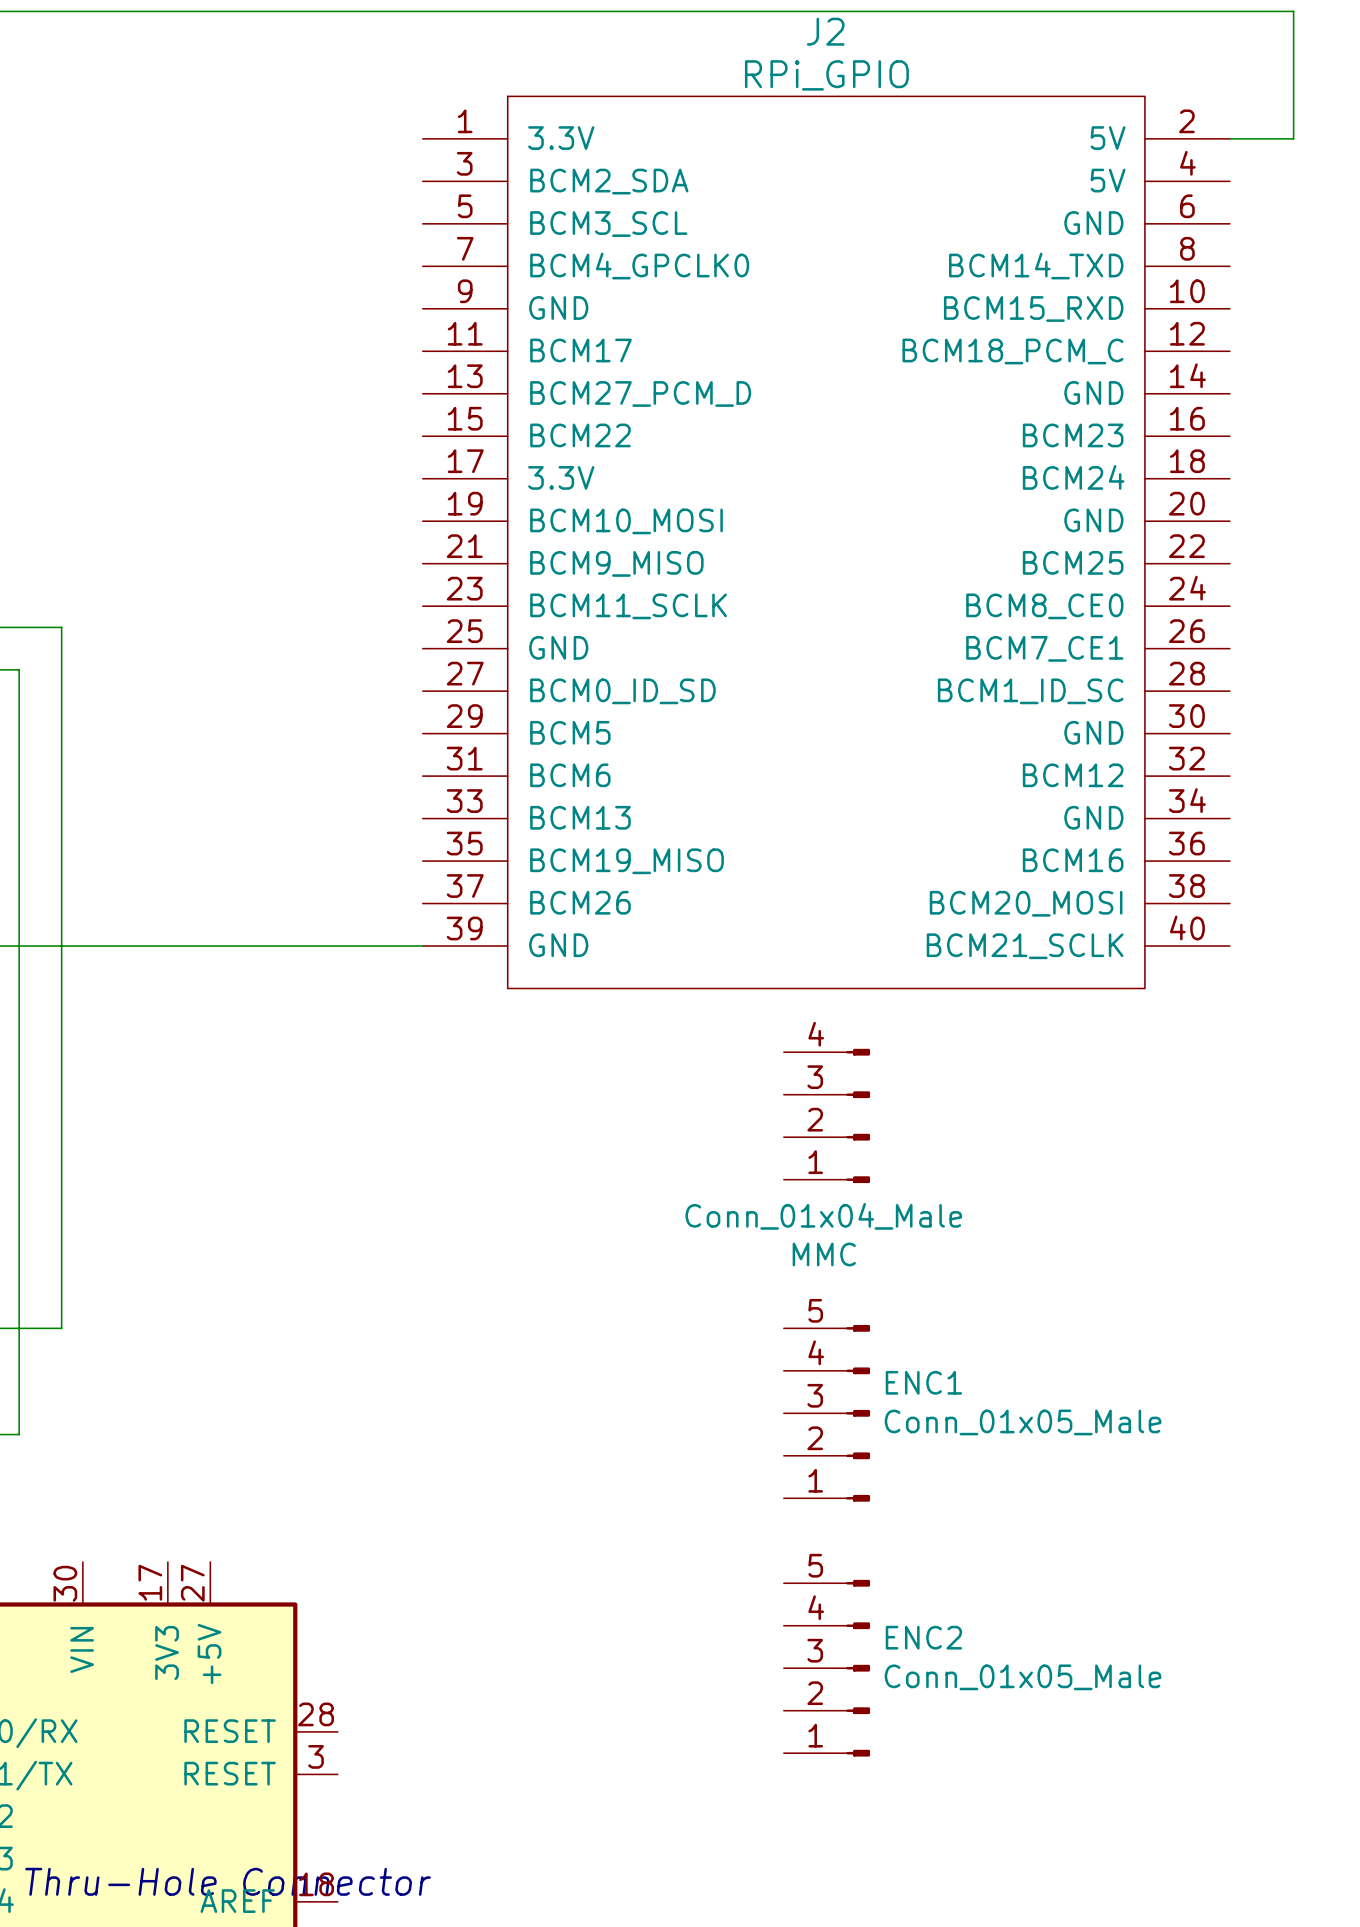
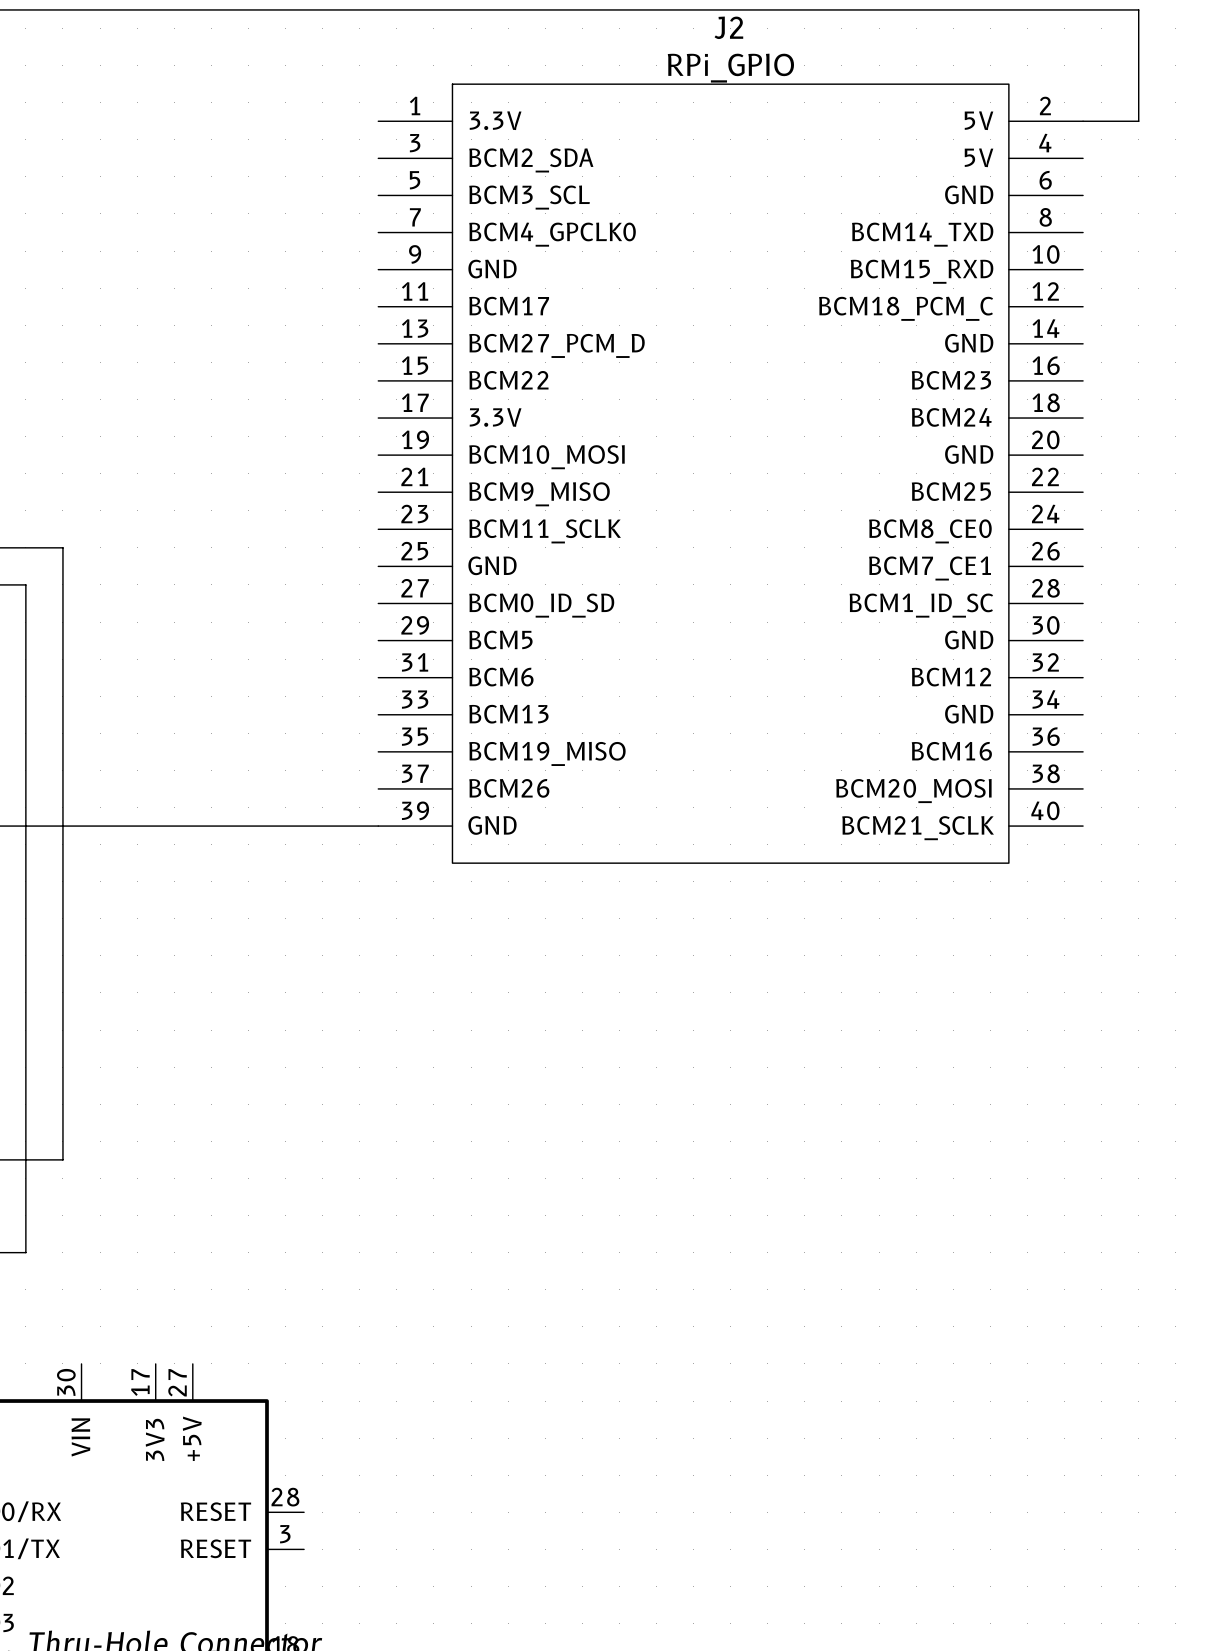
MMC: Conn_01x04_Male (826, 1115) -> none
ENC1: Conn_01x05_Male (826, 1413) -> none
ENC2: Conn_01x05_Male (826, 1668) -> none

